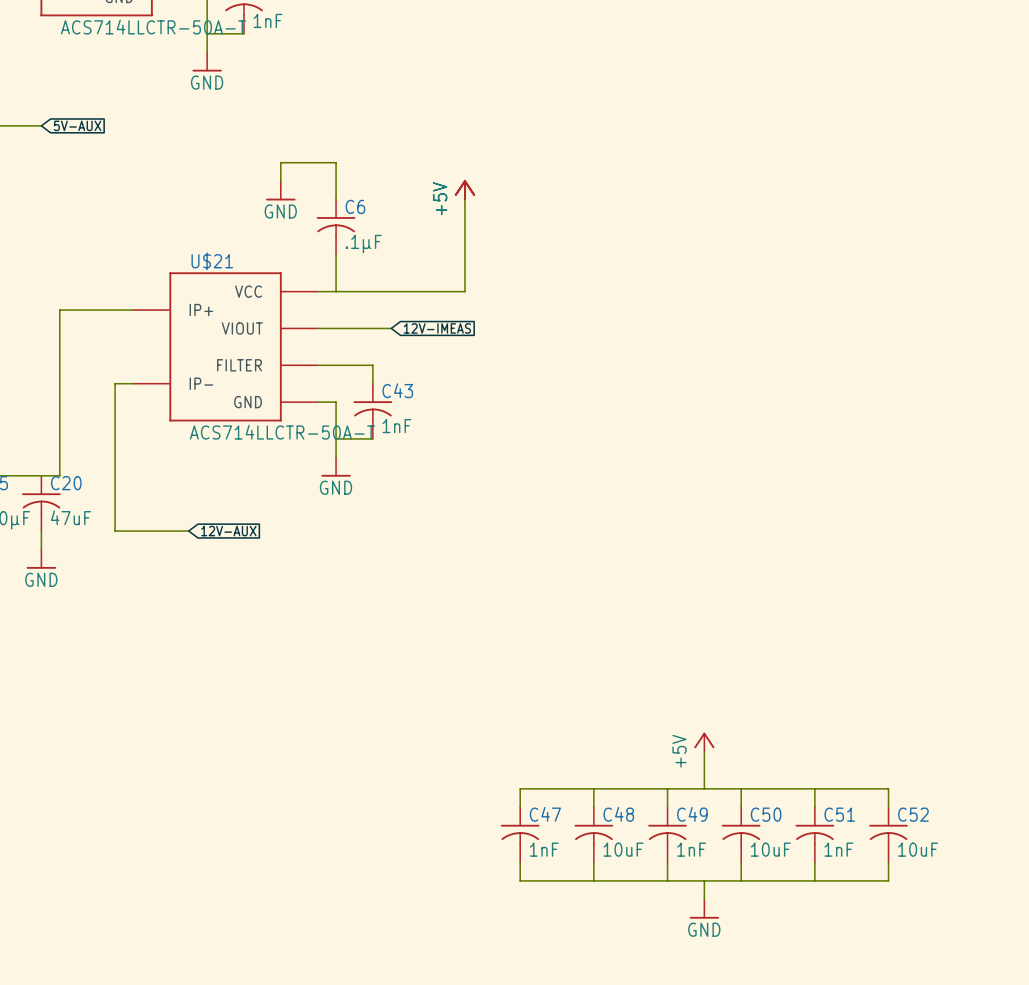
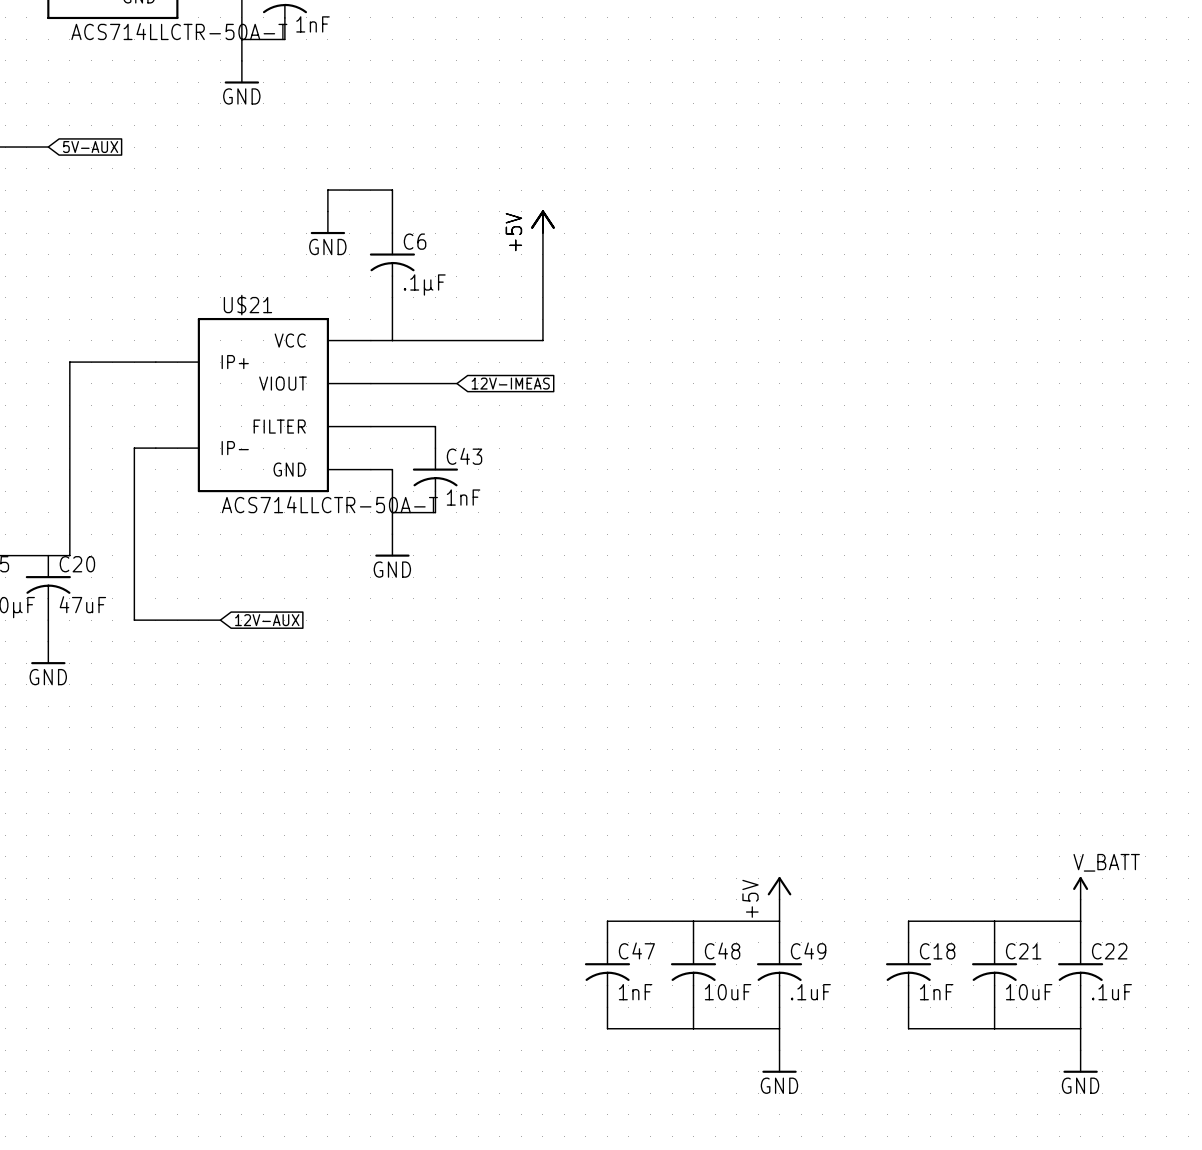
power symbol position: +5V (704, 742) -> +5V (779, 888)
wire: (704, 752) (704, 788) -> none
power symbol: none -> V_BATT (1080, 888)
wire: none -> (1080, 899) (1080, 942)
wire: (667, 788) (778, 788) -> (779, 921) (779, 899)
wire: (741, 788) (741, 807) -> (994, 921) (994, 942)
wire: (814, 788) (814, 807) -> (908, 921) (908, 942)
wire: (888, 788) (888, 807) -> (1037, 921) (1080, 921)
C50: 10uF (741, 834) -> none
C18: none -> 1nF (908, 974)
C51: 1nF (814, 834) -> none
C21: none -> 10uF (994, 974)
C52: 10uF (888, 834) -> none
C22: none -> .1uF (1080, 974)
C49 value: 1nF (691, 849) -> .1uF (810, 992)
wire: (741, 862) (741, 880) -> none
wire: (814, 862) (814, 880) -> (994, 1007) (994, 1028)
wire: (888, 862) (888, 880) -> (1080, 1028) (1037, 1028)
wire: none -> (1080, 1007) (1080, 1050)
wire: (667, 880) (778, 880) -> (908, 1007) (908, 1028)
wire: (704, 880) (704, 899) -> (779, 1028) (779, 1050)
power symbol position: GND (704, 909) -> GND (779, 1061)
power symbol: none -> GND (1080, 1061)

